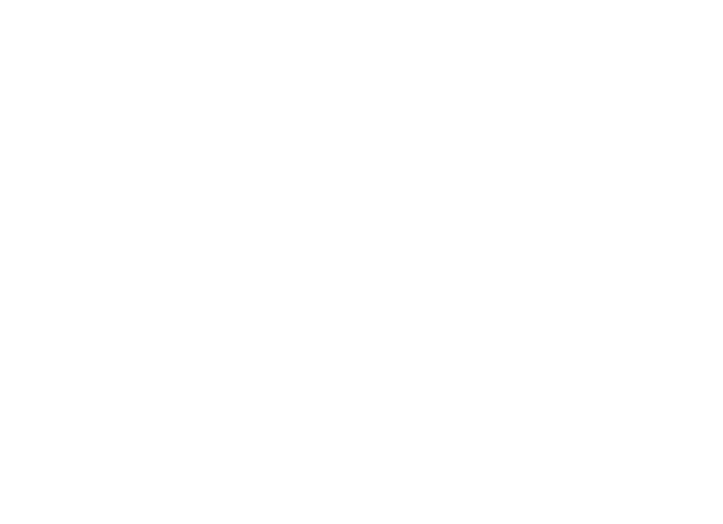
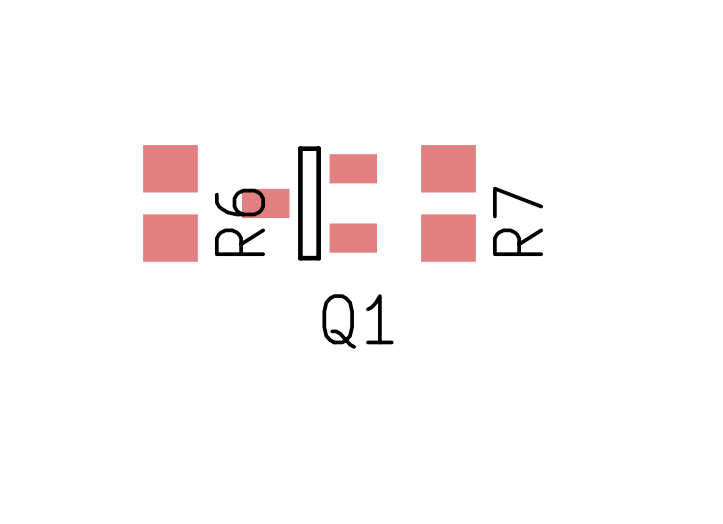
R6: none -> (170, 203)
Q1: none -> (309, 203)
R7: none -> (448, 203)

